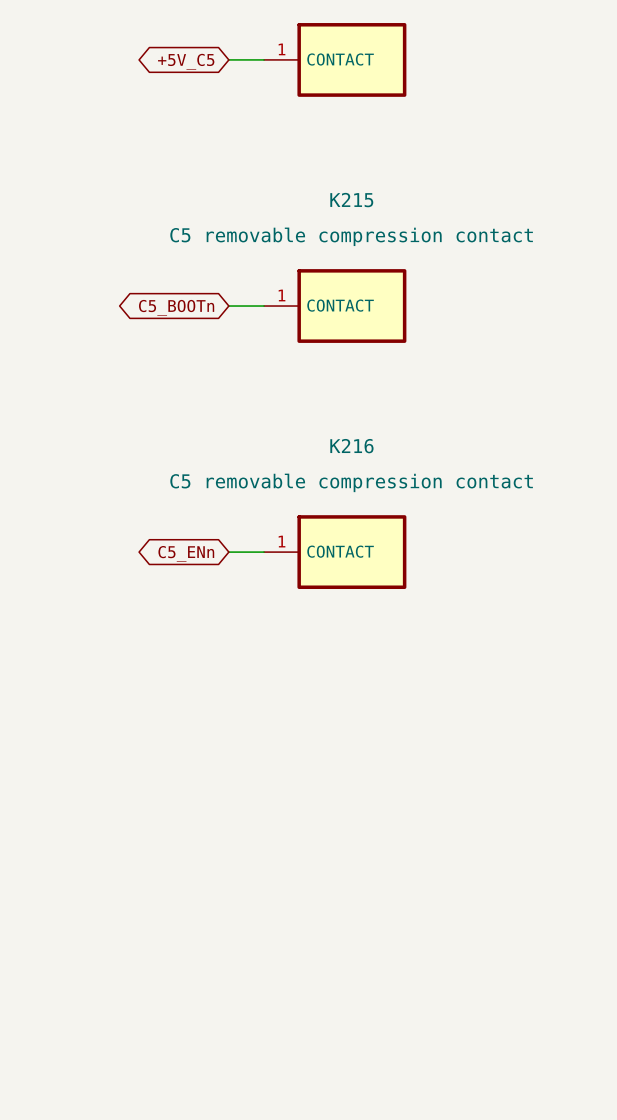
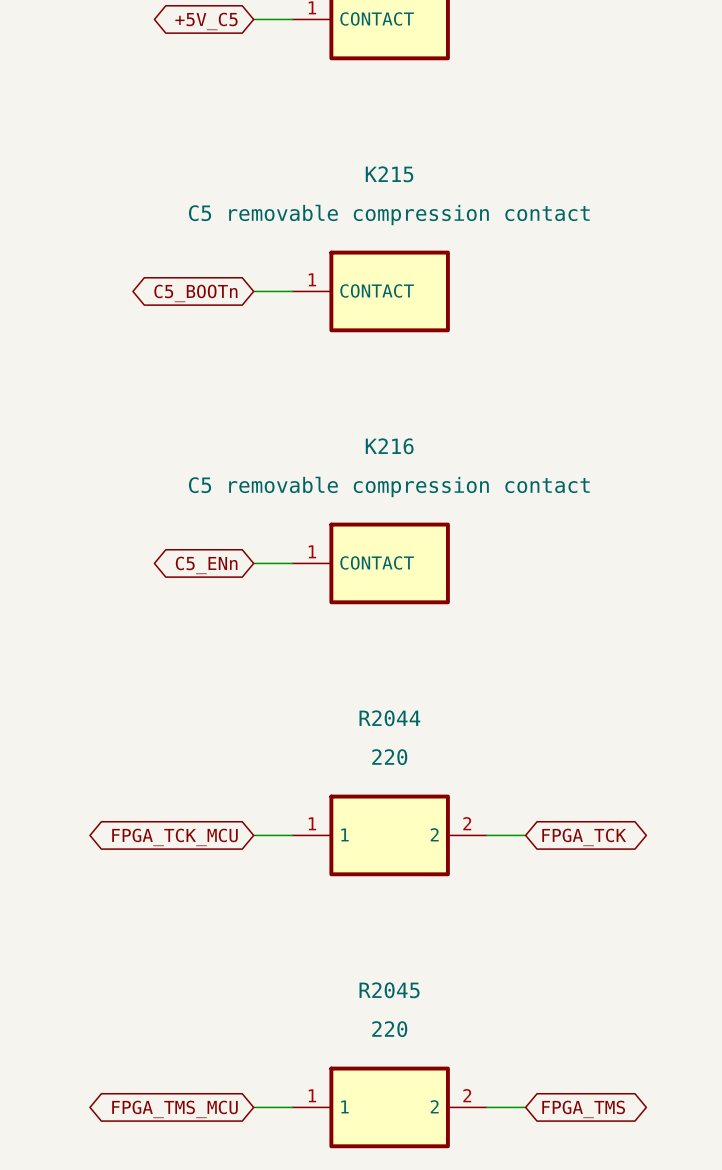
wire: none -> (253, 835) (292, 835)
R2044: none -> 220 (389, 835)
wire: none -> (486, 835) (525, 835)
global label: none -> FPGA_TCK_MCU (174, 837)
global label: none -> FPGA_TCK (584, 837)
wire: none -> (253, 1107) (292, 1107)
R2045: none -> 220 (389, 1107)
wire: none -> (486, 1107) (525, 1107)
global label: none -> FPGA_TMS_MCU (174, 1109)
global label: none -> FPGA_TMS (583, 1109)

